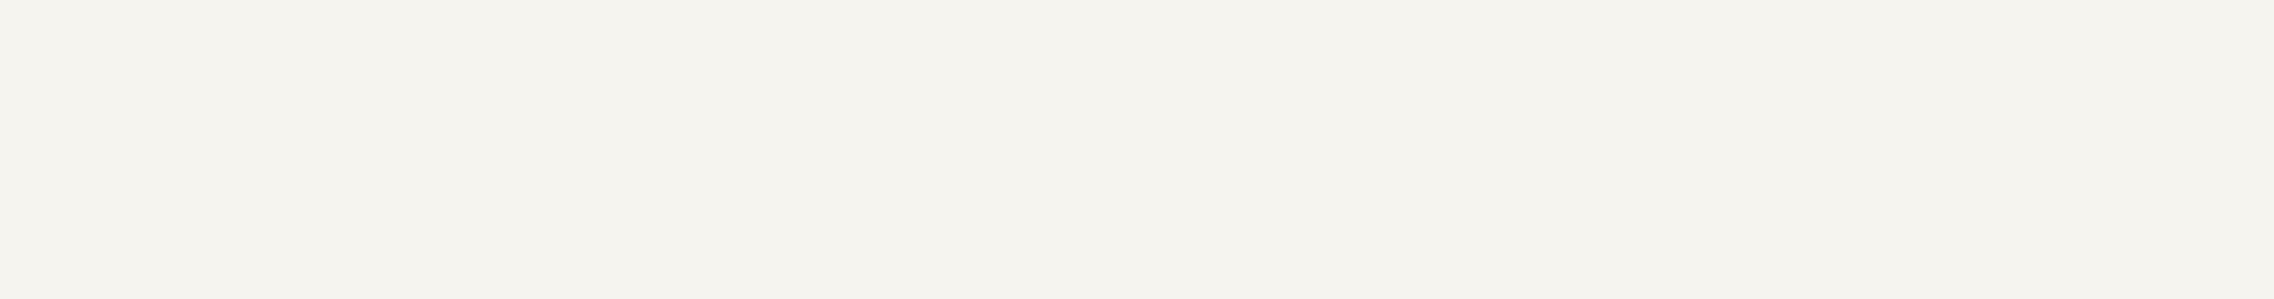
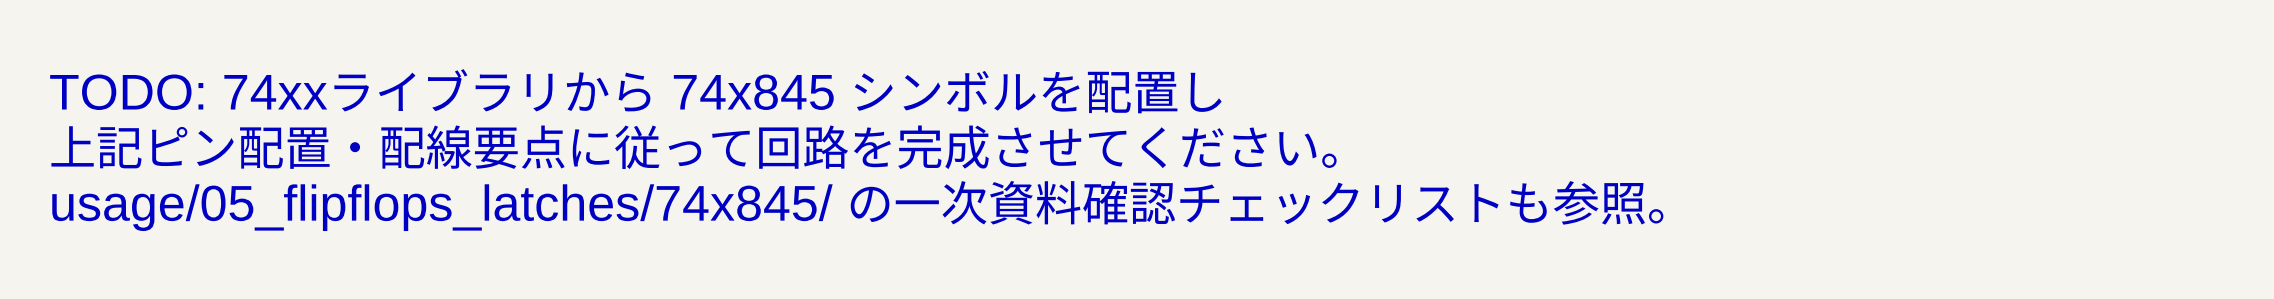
text: none -> TODO: 74xxライブラリから 74x845 シンボルを配置し (635, 91)
text: none -> 上記ピン配置・配線要点に従って回路を完成させてください。 (694, 147)
text: none -> usage/05_flipflops_latches/74x845/ の一次資料確認チェックリストも参照。 (857, 206)

